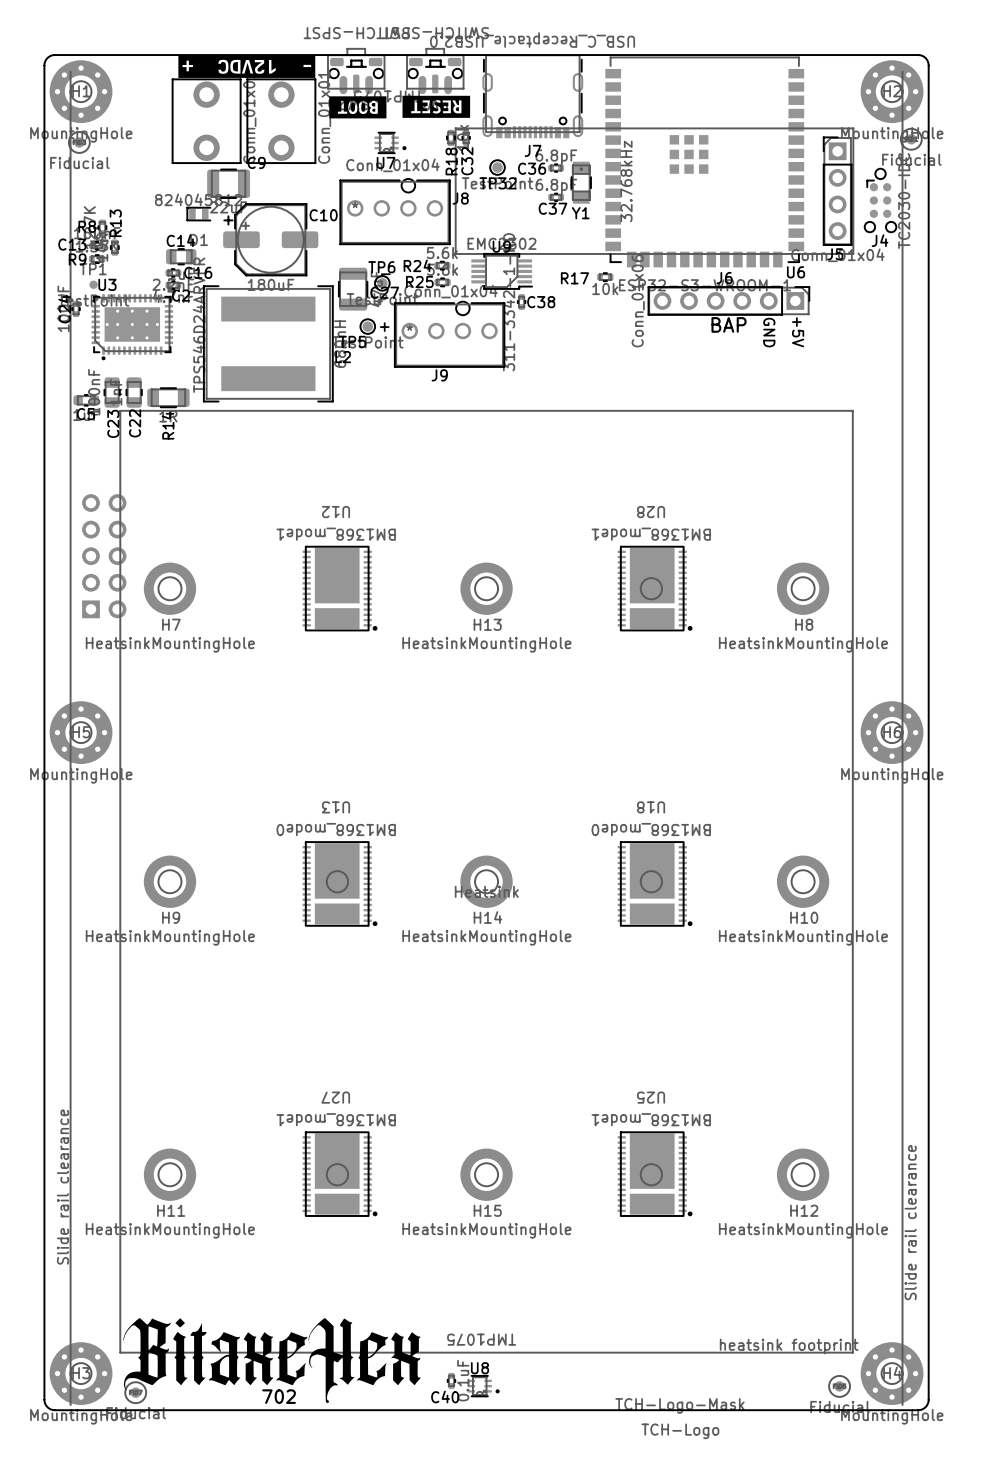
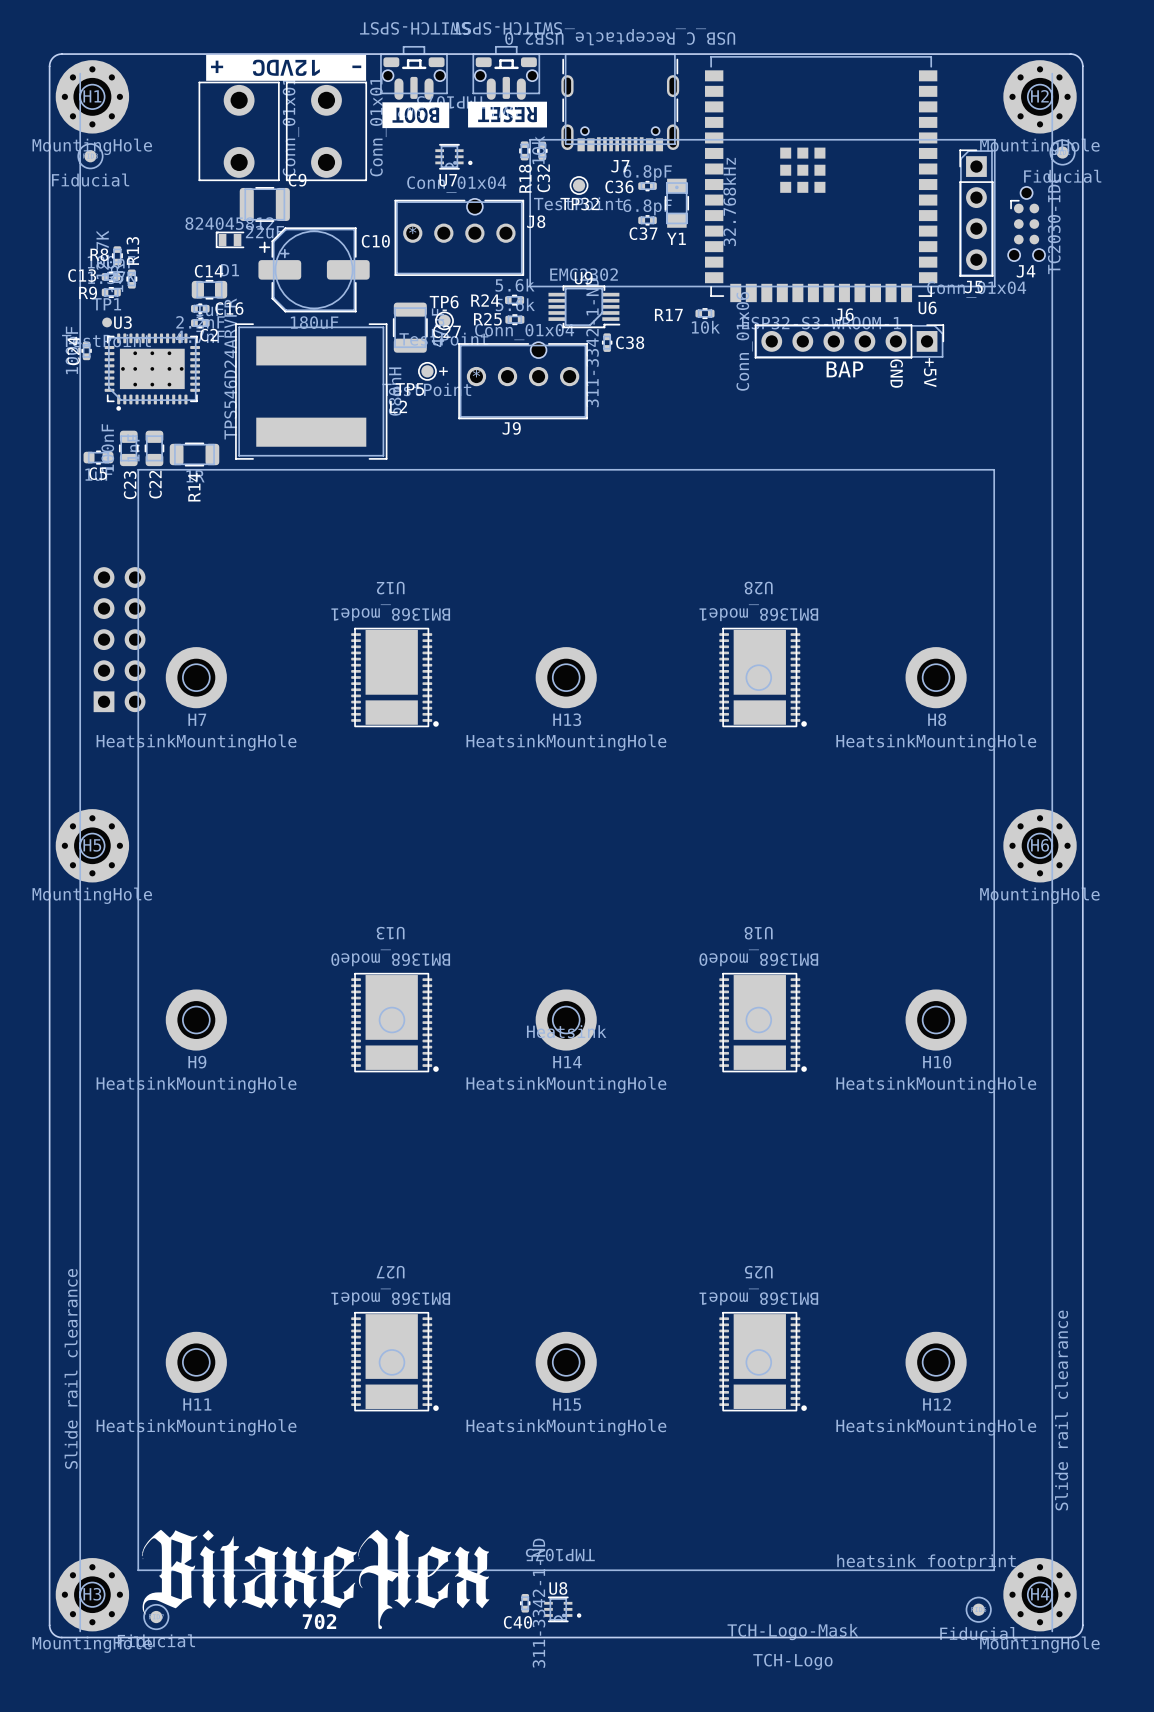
C40 value: 0.1uF (463, 1380) -> 311-3342-1-ND (538, 1603)

